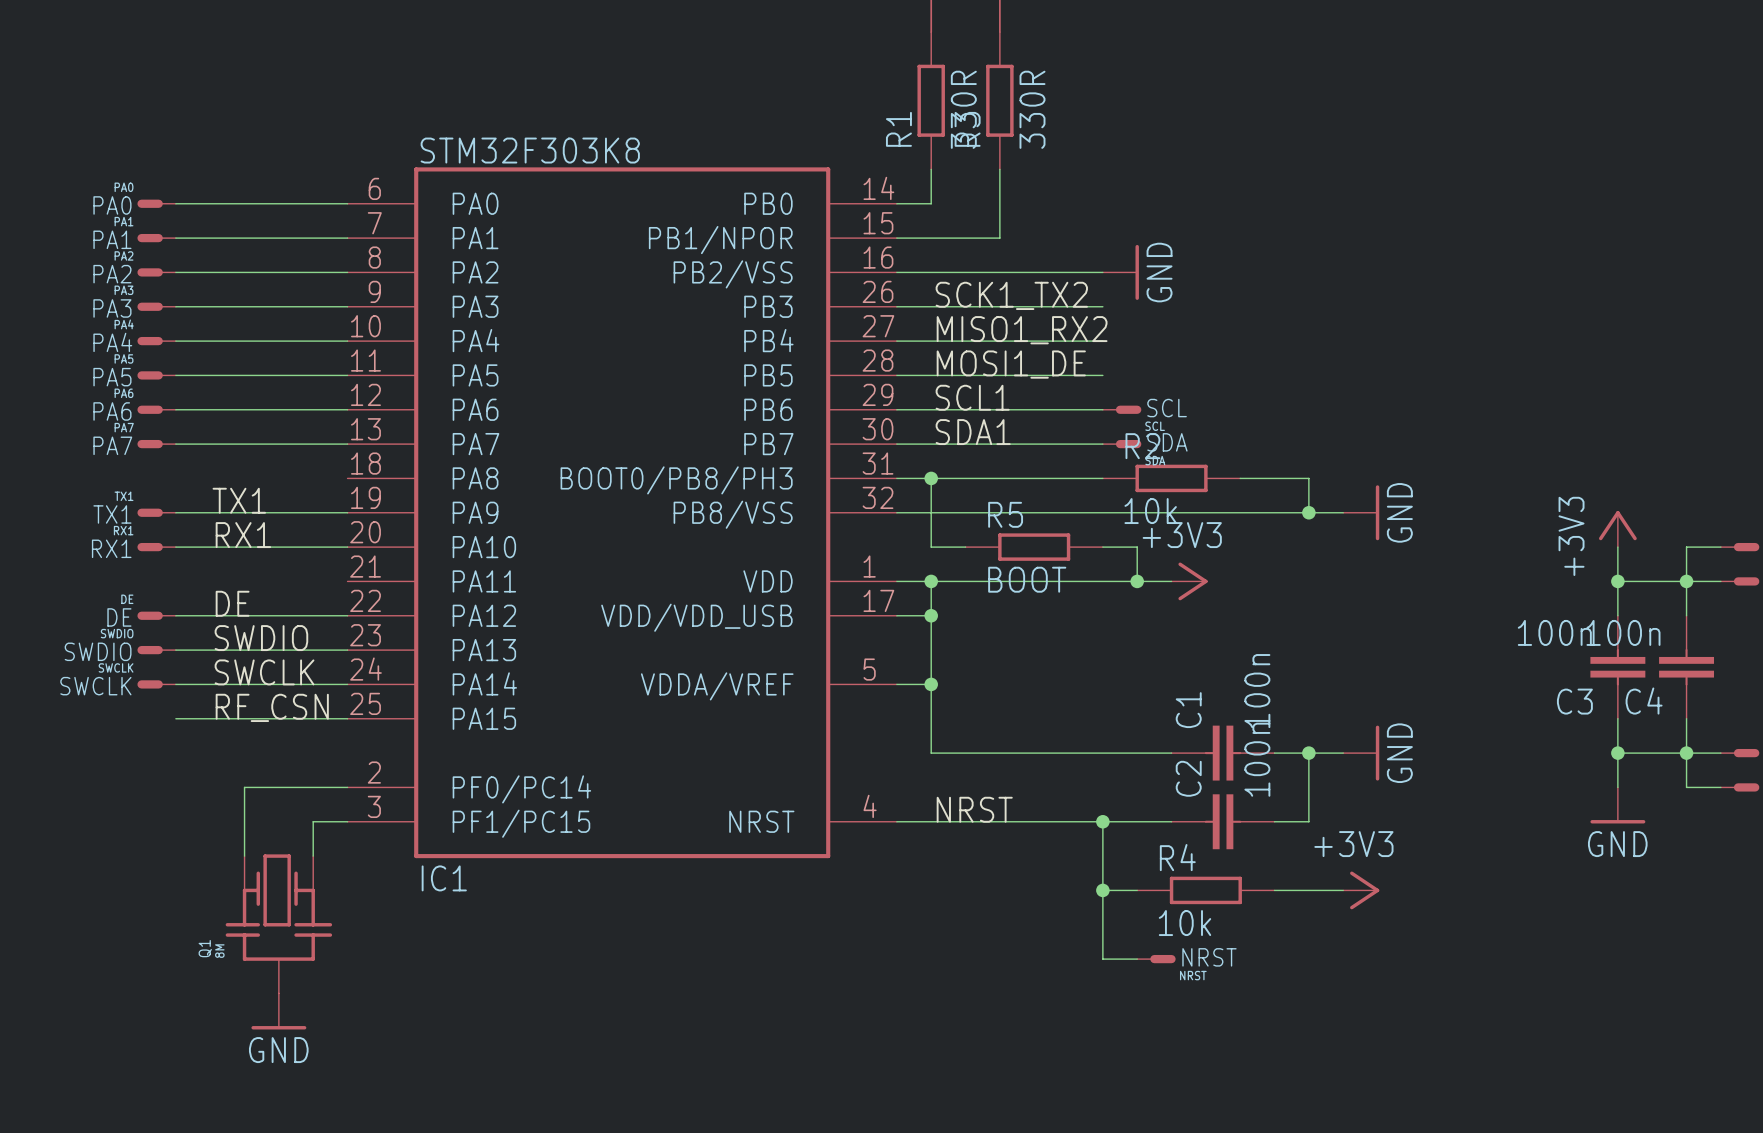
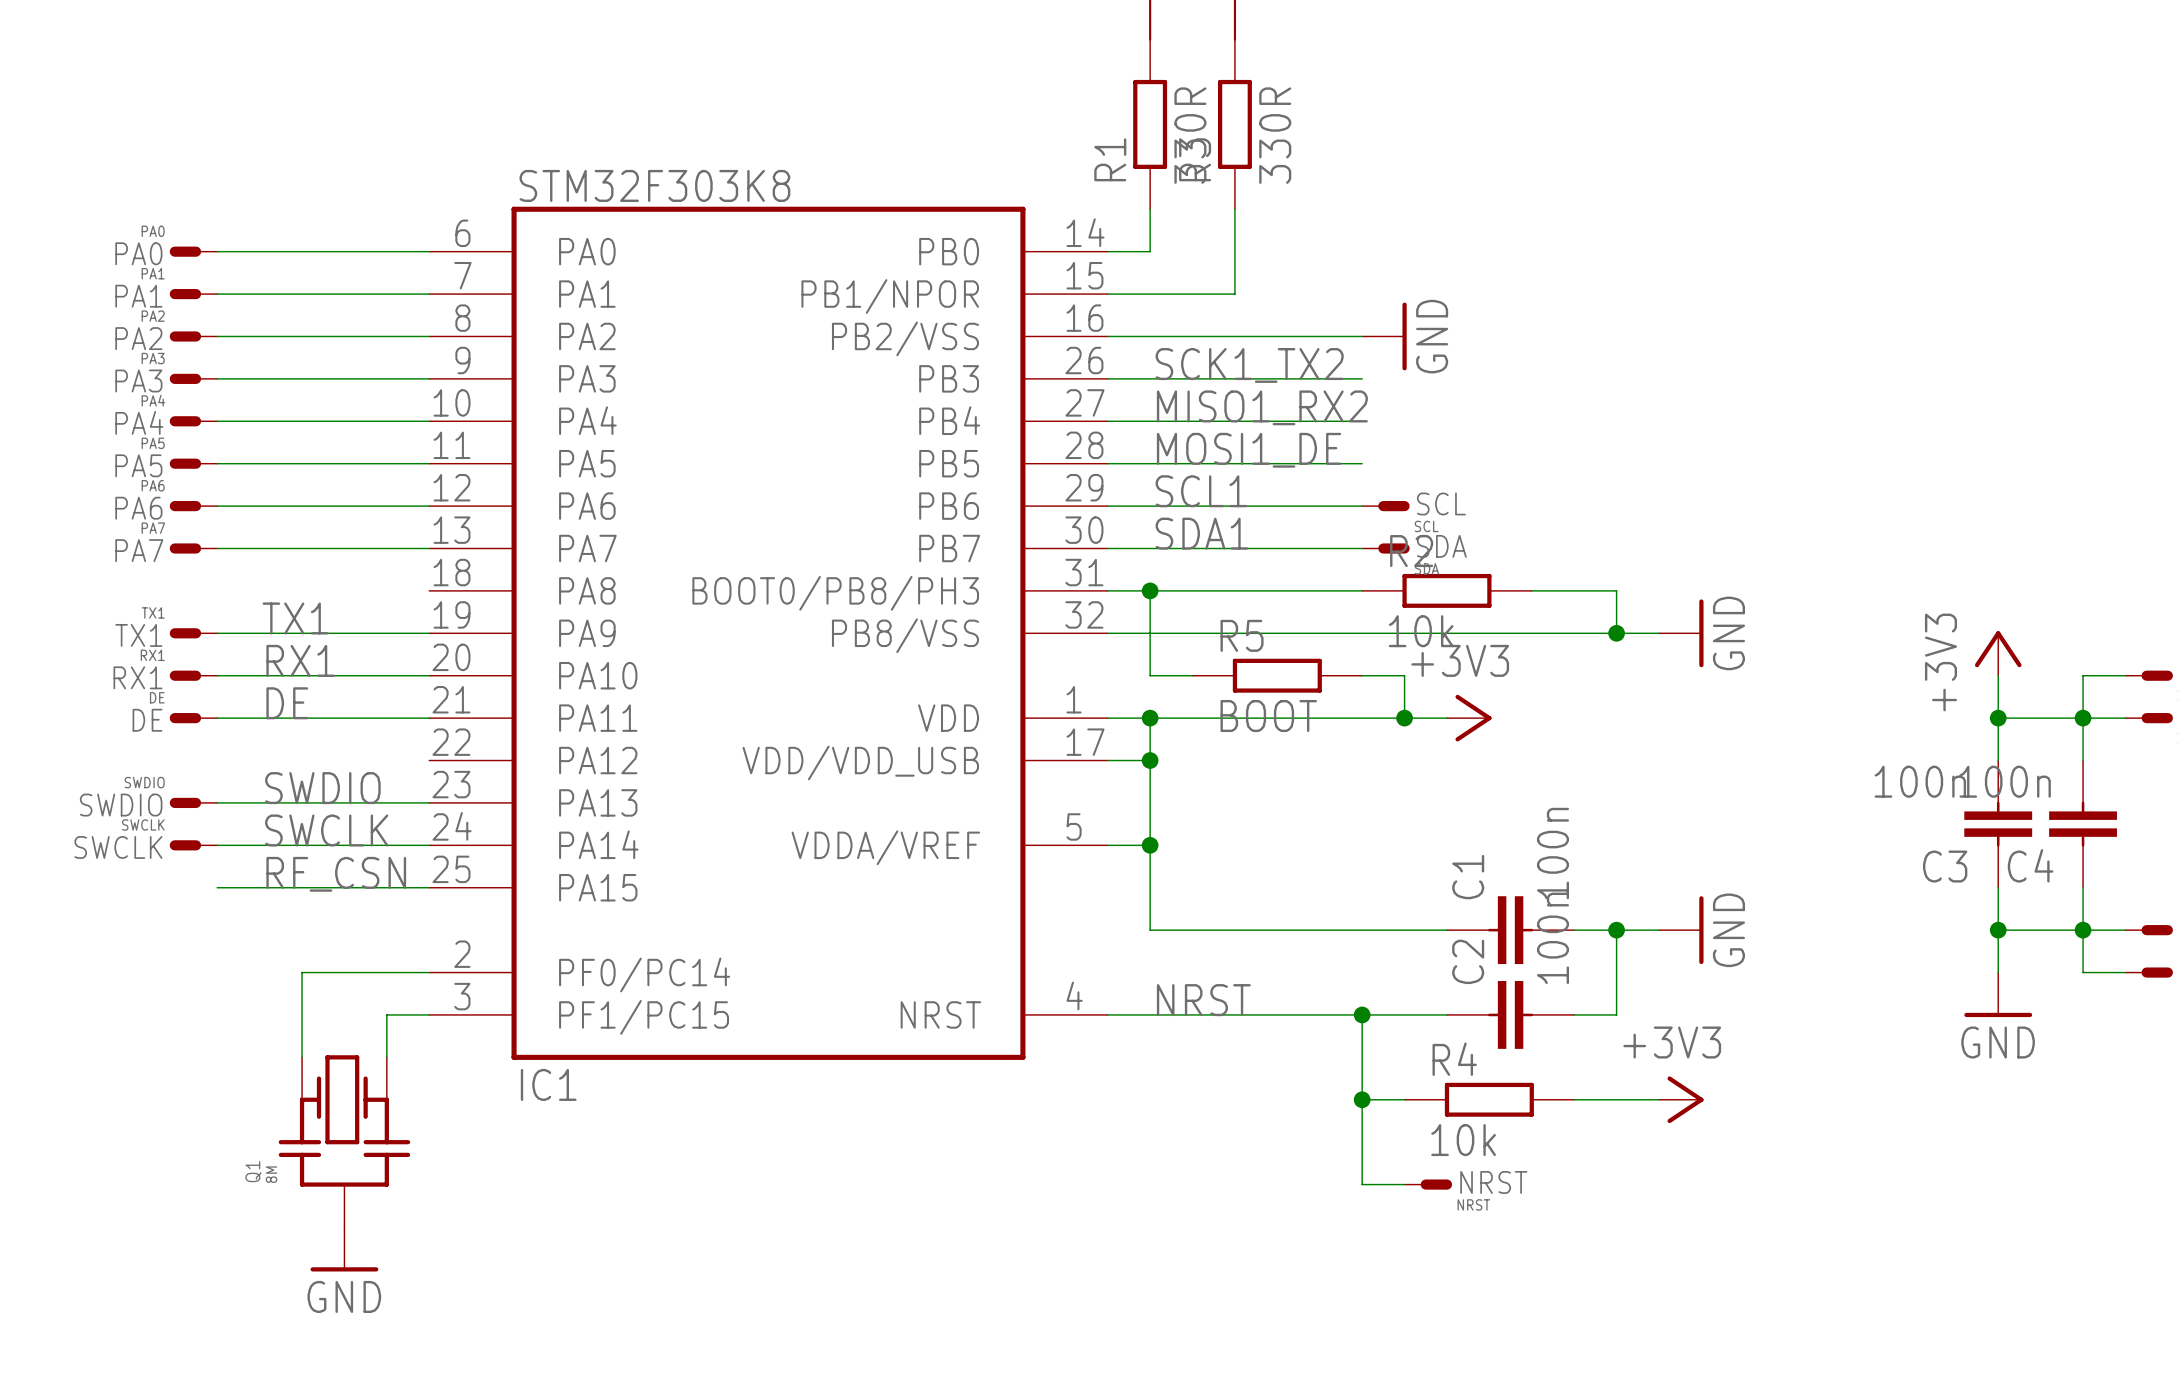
label position: DE (232, 603) -> DE (287, 703)
DE position: (156, 615) -> (193, 718)
wire: (175, 615) (347, 615) -> (217, 718) (429, 718)

